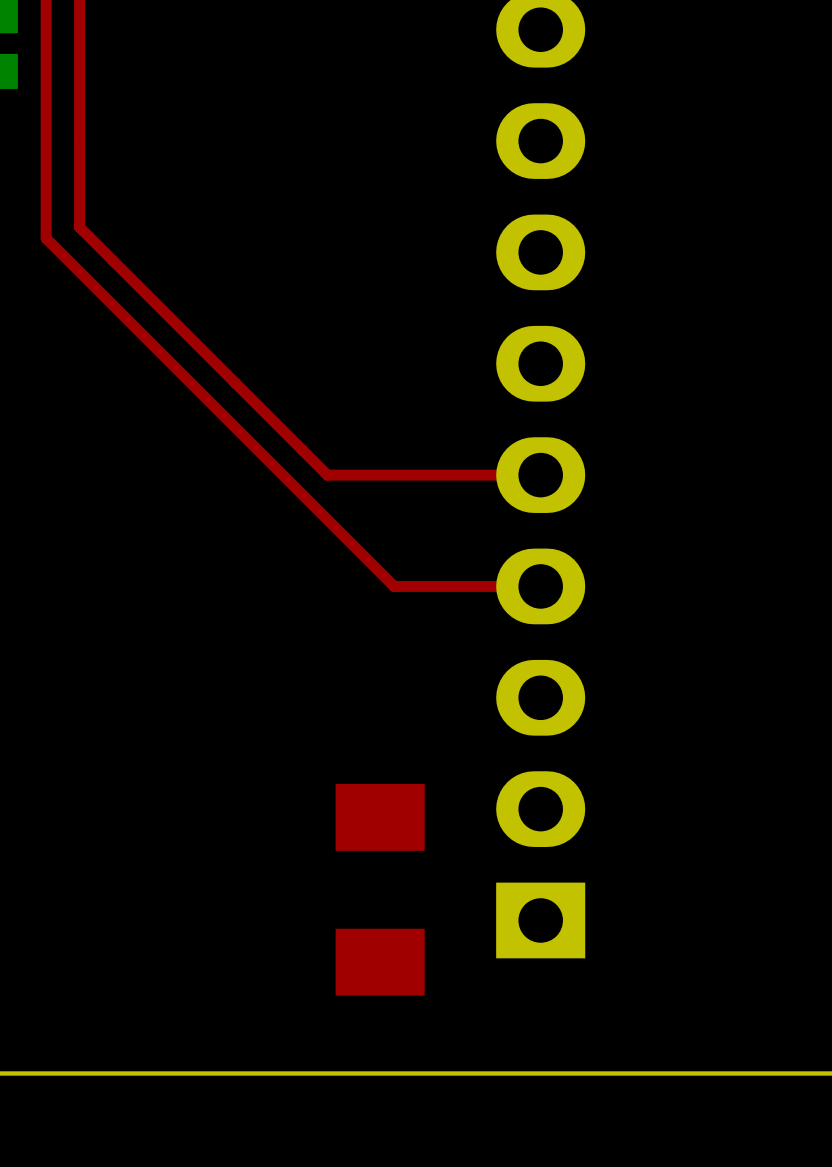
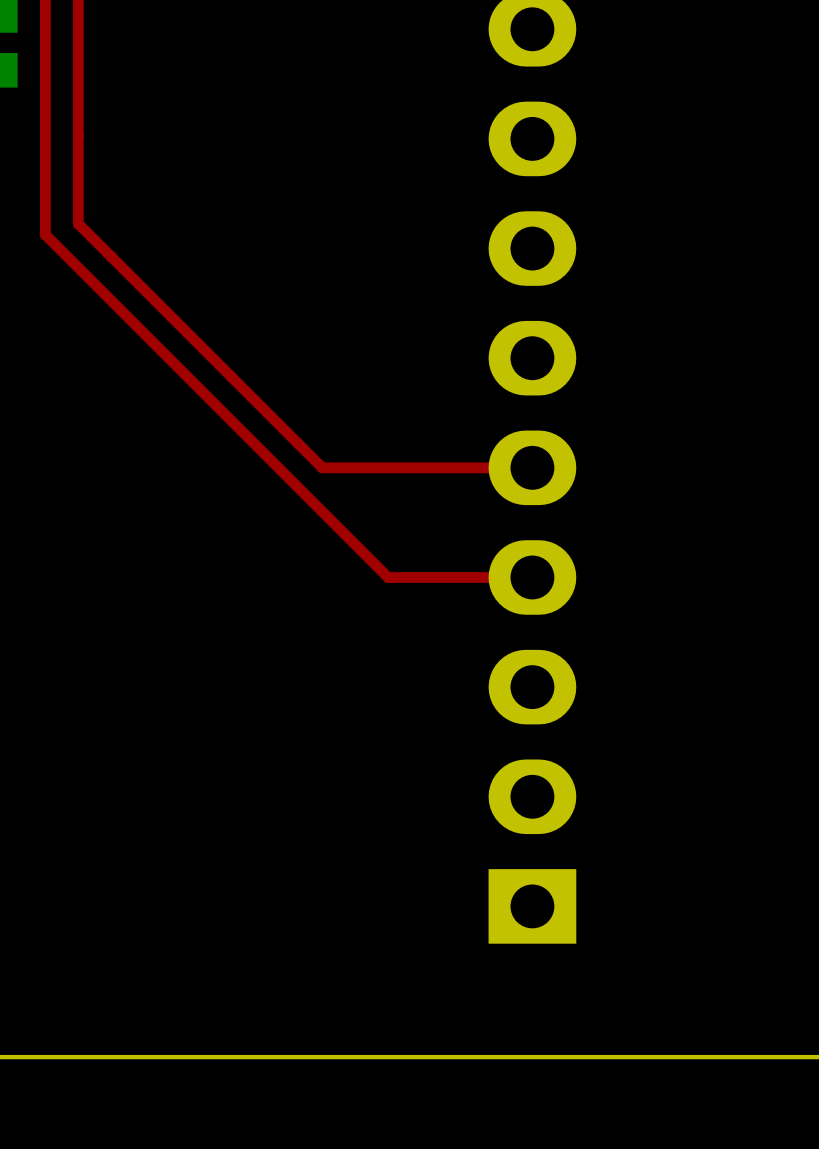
part: (380, 889) -> none

